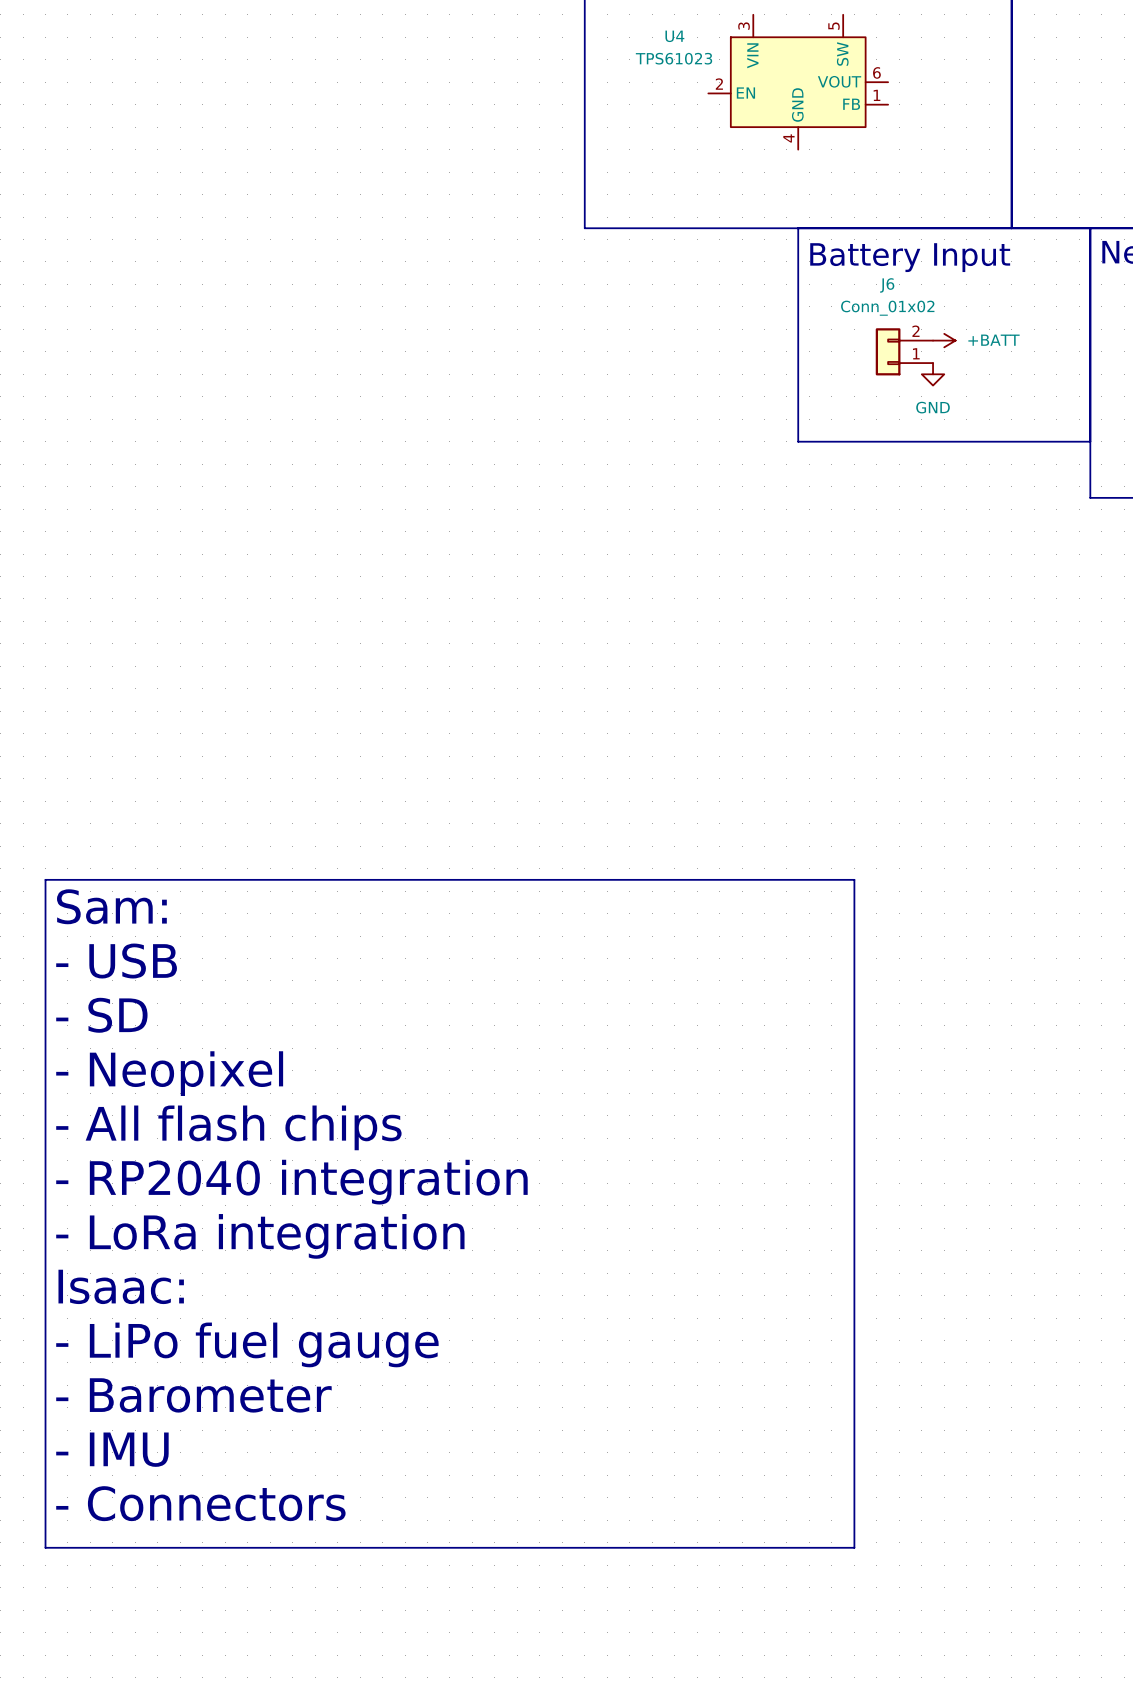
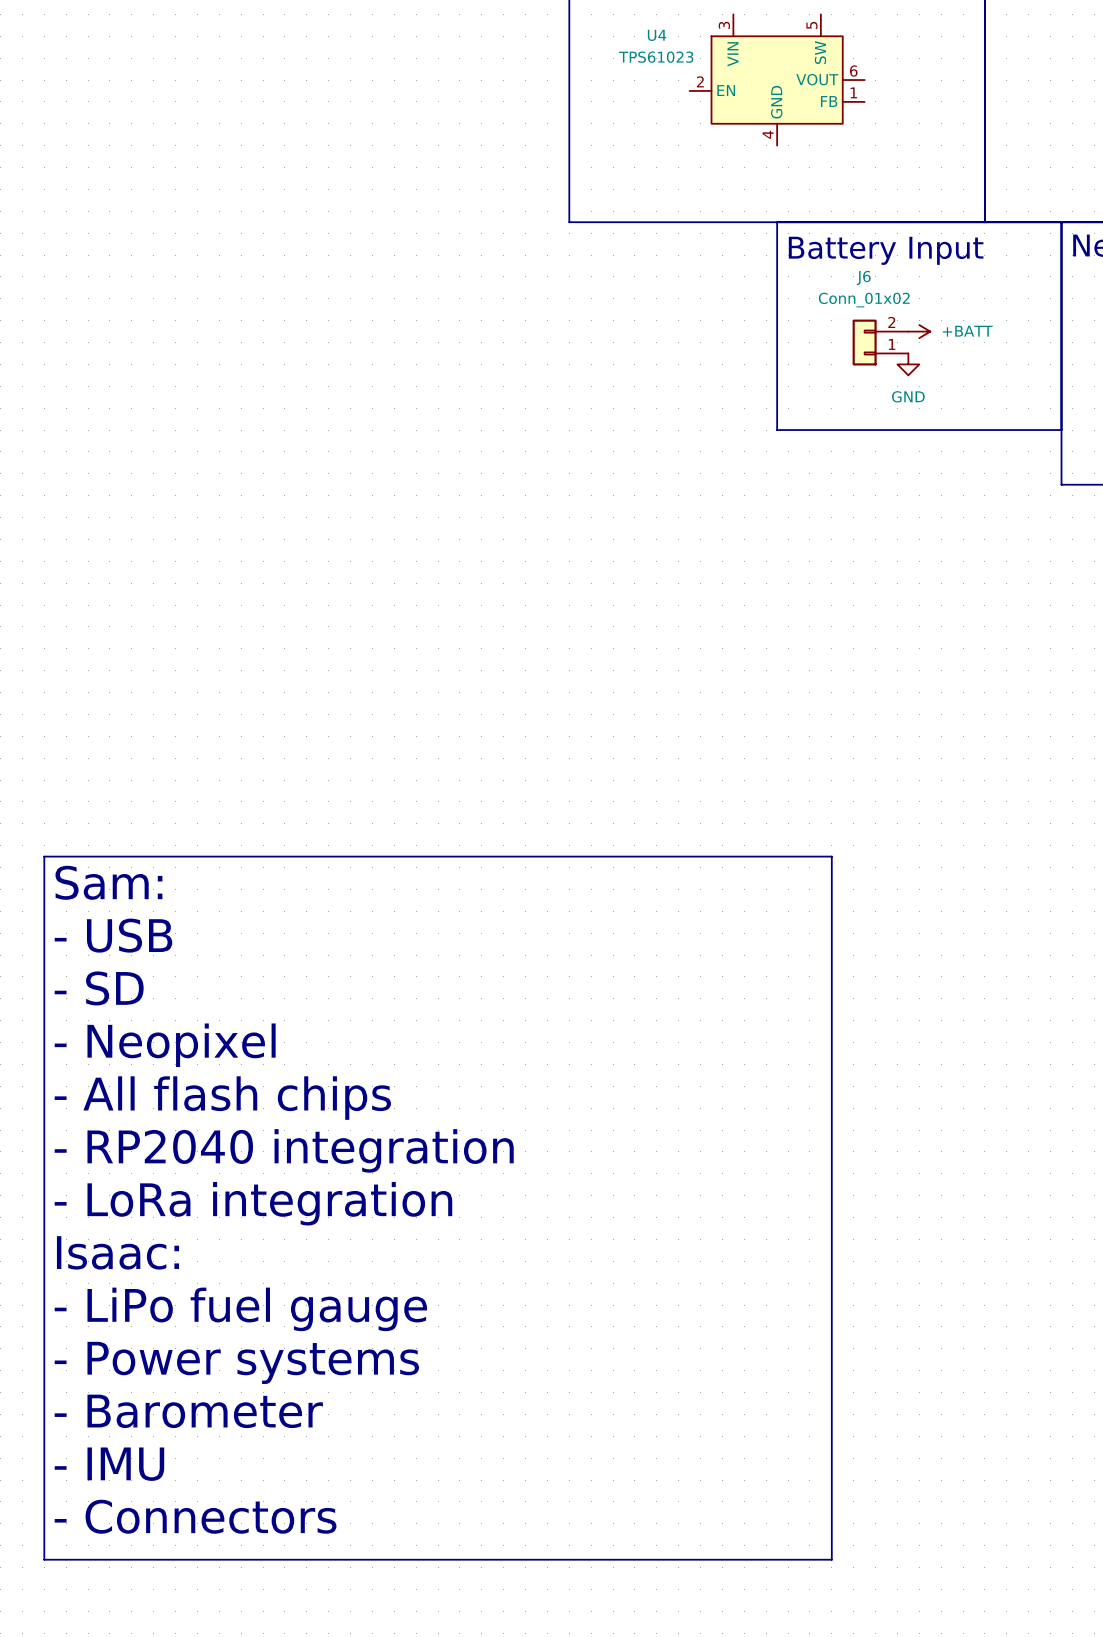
text: - Barometer (193, 1395) -> - Power systems (236, 1362)
text: - IMU (112, 1449) -> - Barometer (188, 1411)
text: - Connectors (200, 1503) -> - IMU (109, 1464)
line: (45, 1547) (854, 1547) -> (44, 1506) (44, 1559) (831, 1559) (831, 1506)
text: none -> - Connectors (195, 1516)

